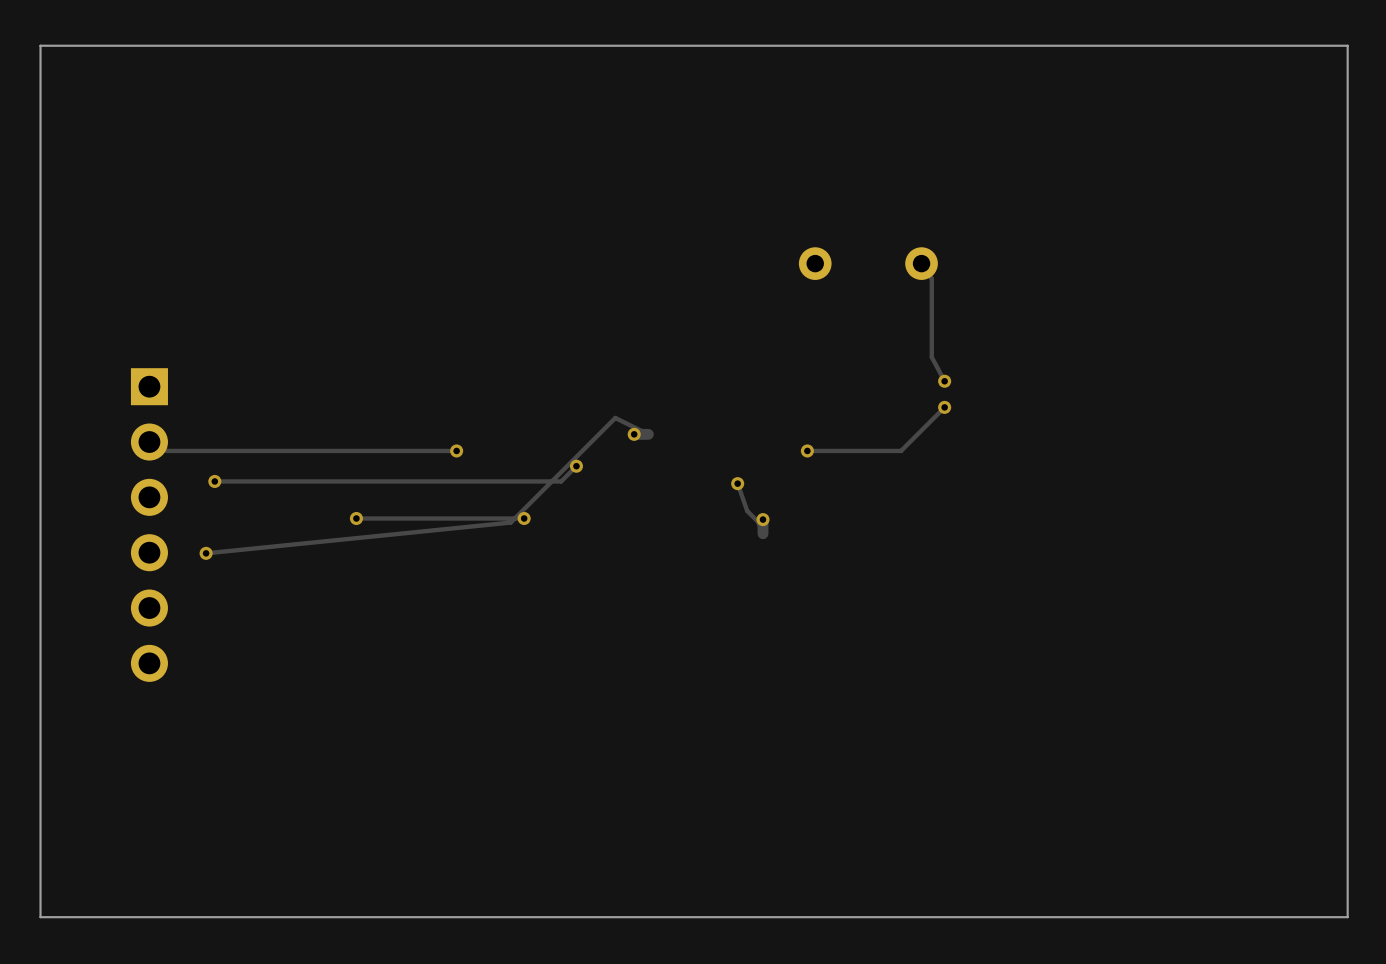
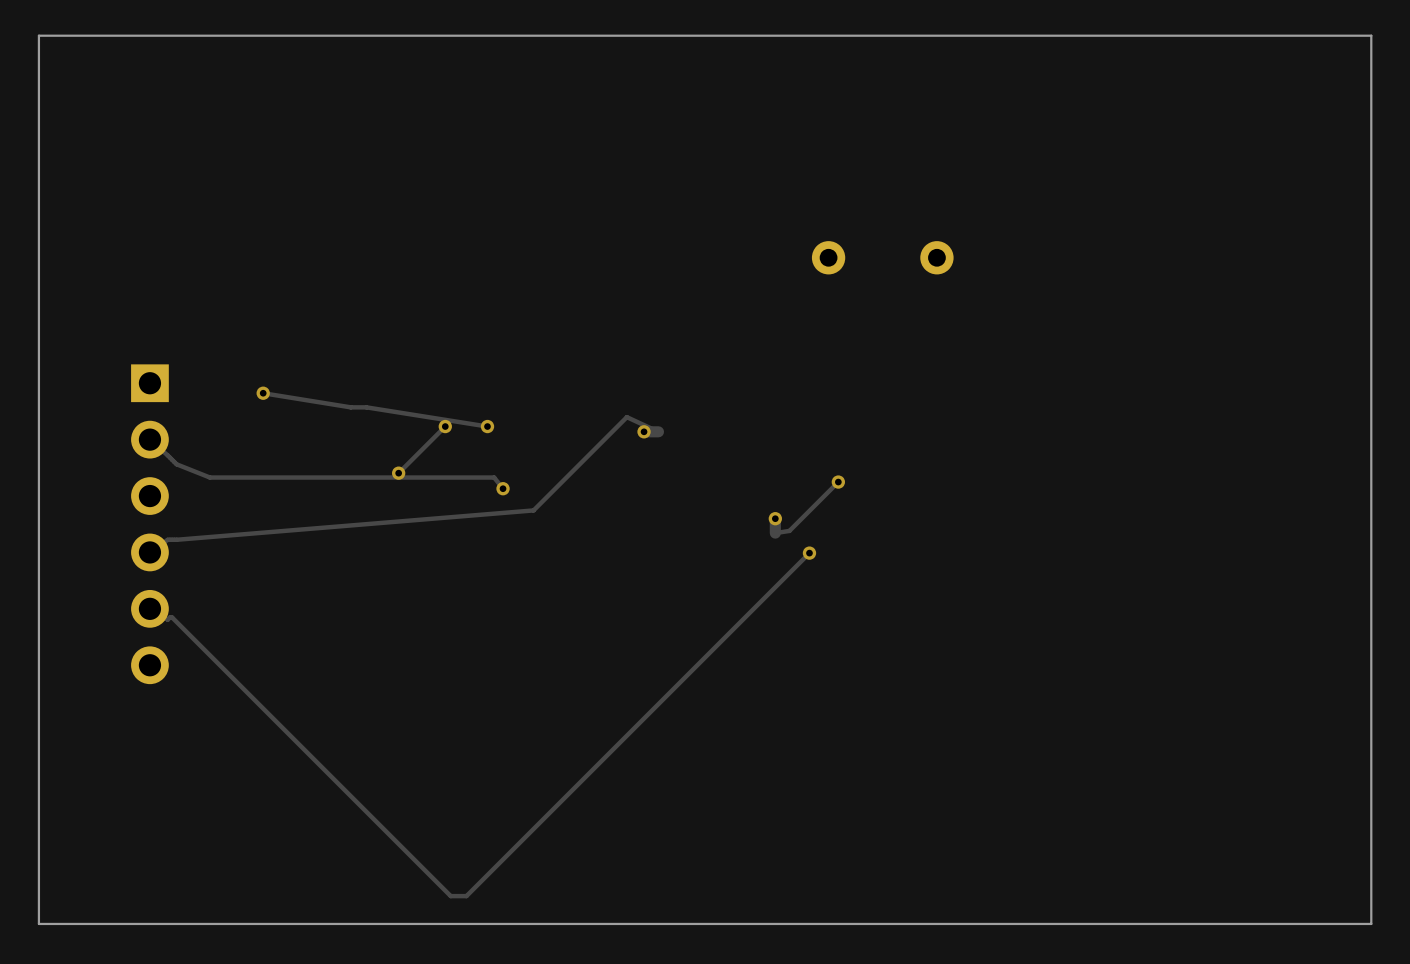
track: (921, 263) (931, 278) (931, 357) (944, 381) -> none
via: (944, 381) -> none
track: none -> (263, 393) (487, 426)
via: none -> (263, 393)
track: (944, 407) (901, 450) (807, 450) -> none
via: (944, 407) -> none
track: none -> (445, 426) (398, 473)
via: none -> (445, 426)
via: none -> (487, 426)
track: (648, 434) (615, 417) (510, 522) (206, 553) -> (658, 431) (626, 417) (533, 510) (167, 539) (149, 552)
track: (149, 442) (166, 450) (456, 450) -> (149, 439) (176, 464) (209, 477) (494, 477) (503, 488)
via: (456, 450) -> none
via position: (807, 450) -> (838, 482)
track: (576, 466) (561, 481) (214, 481) -> none
via: (576, 466) -> none
via: none -> (398, 473)
via: (214, 481) -> none
track: (737, 483) (747, 511) (758, 521) (763, 533) -> (838, 482) (789, 530) (775, 533)
via: (737, 483) -> none
via: none -> (503, 488)
via: (356, 518) -> none
track: (524, 518) (356, 518) -> none
via: (524, 518) -> none
via: (206, 553) -> none
track: none -> (809, 553) (466, 896) (450, 896) (172, 617) (167, 619) (149, 608)
via: none -> (809, 553)

